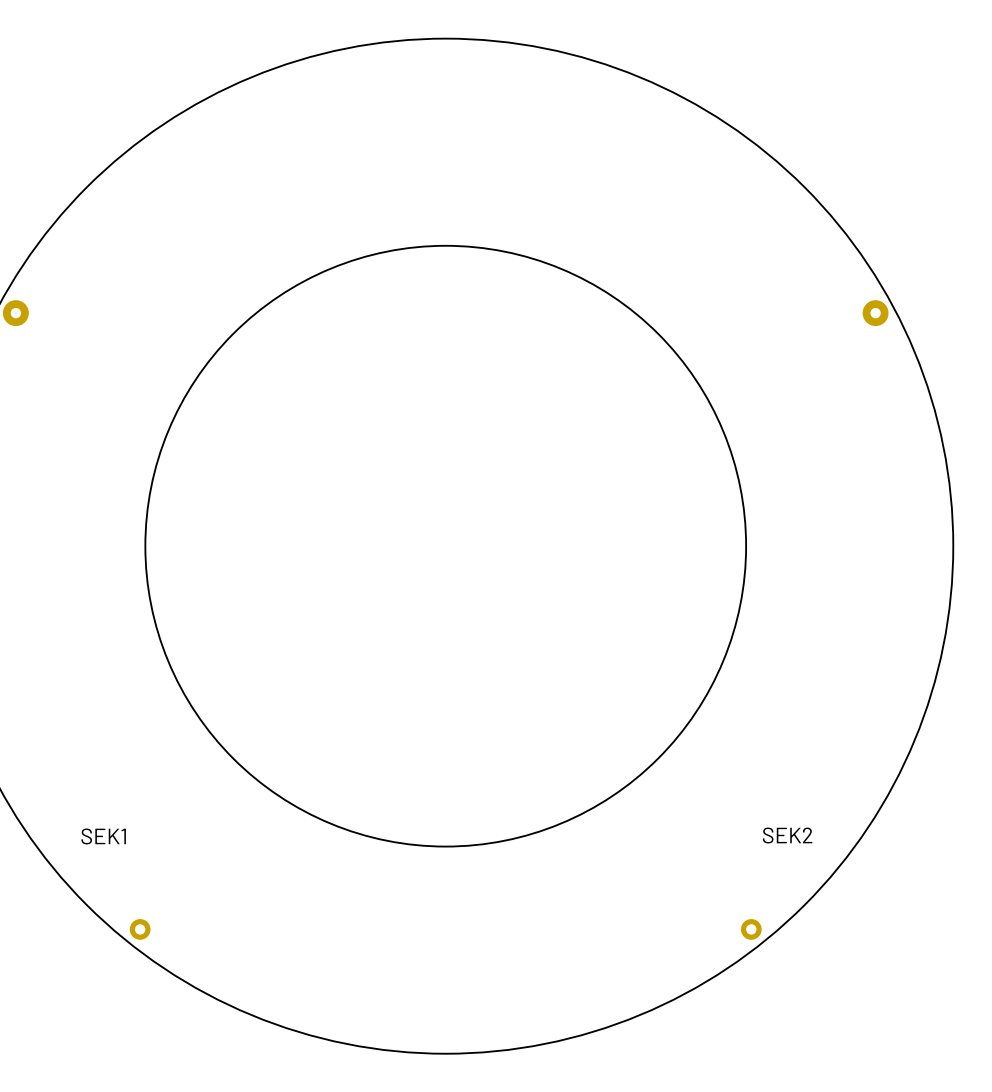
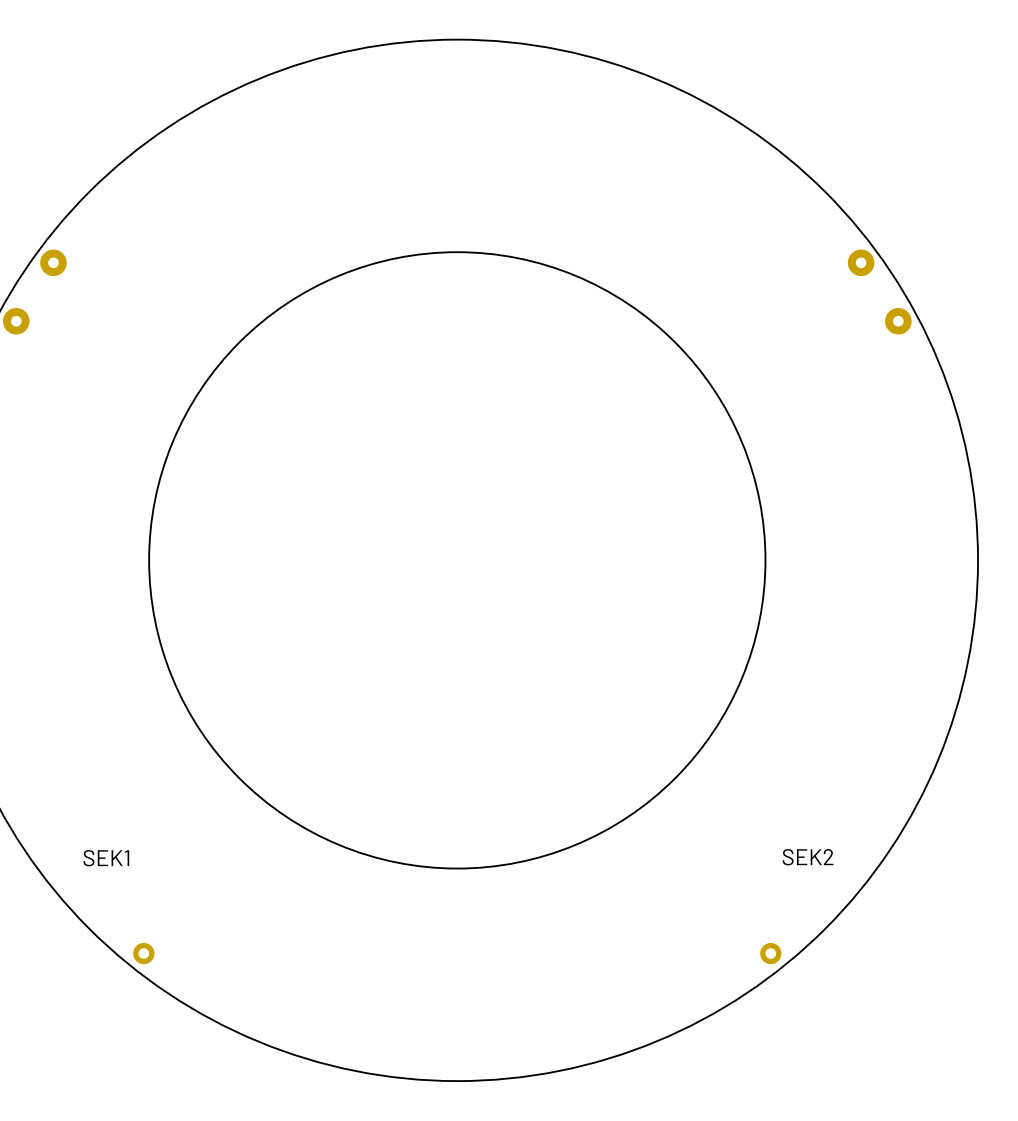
part: none -> (53, 262)
part: none -> (861, 262)

